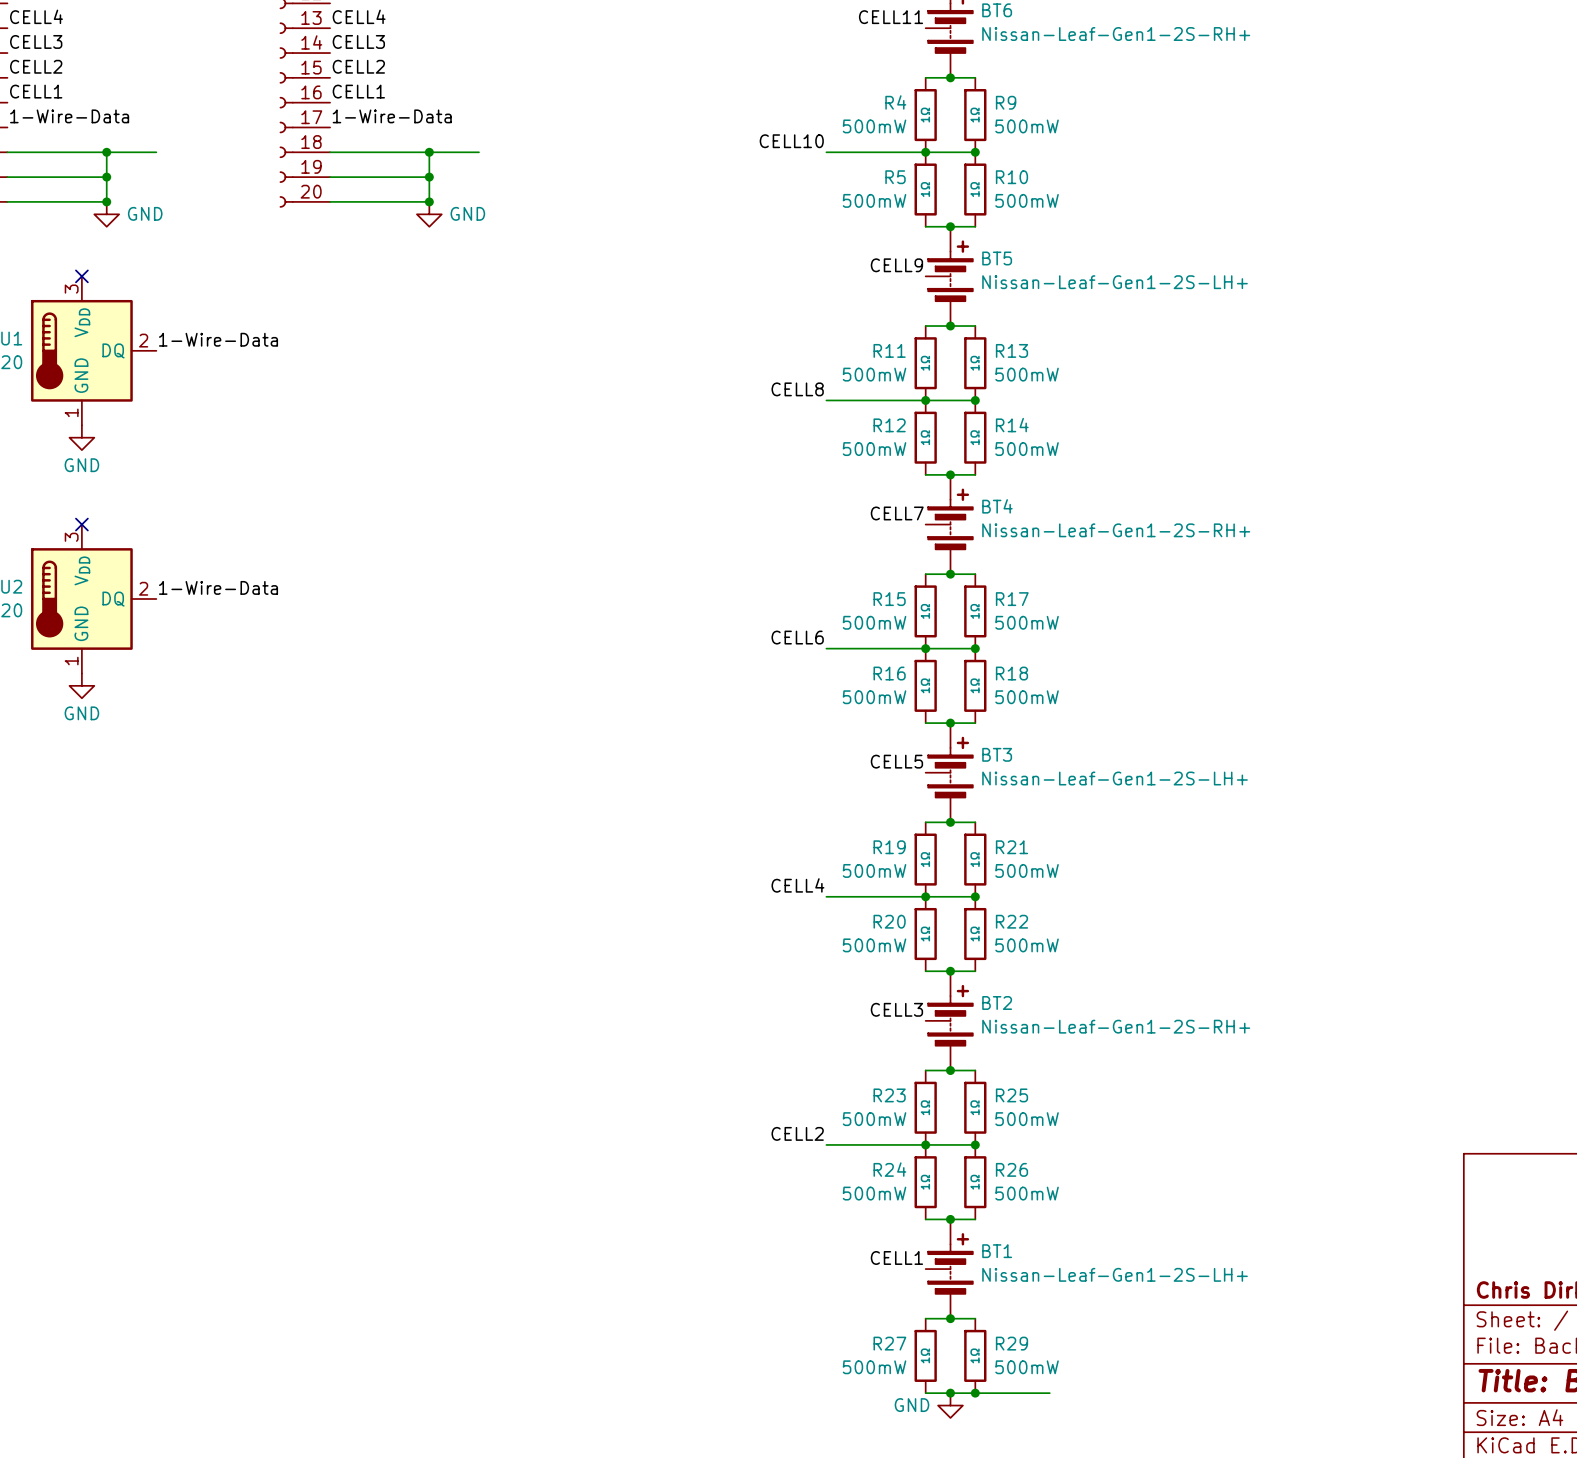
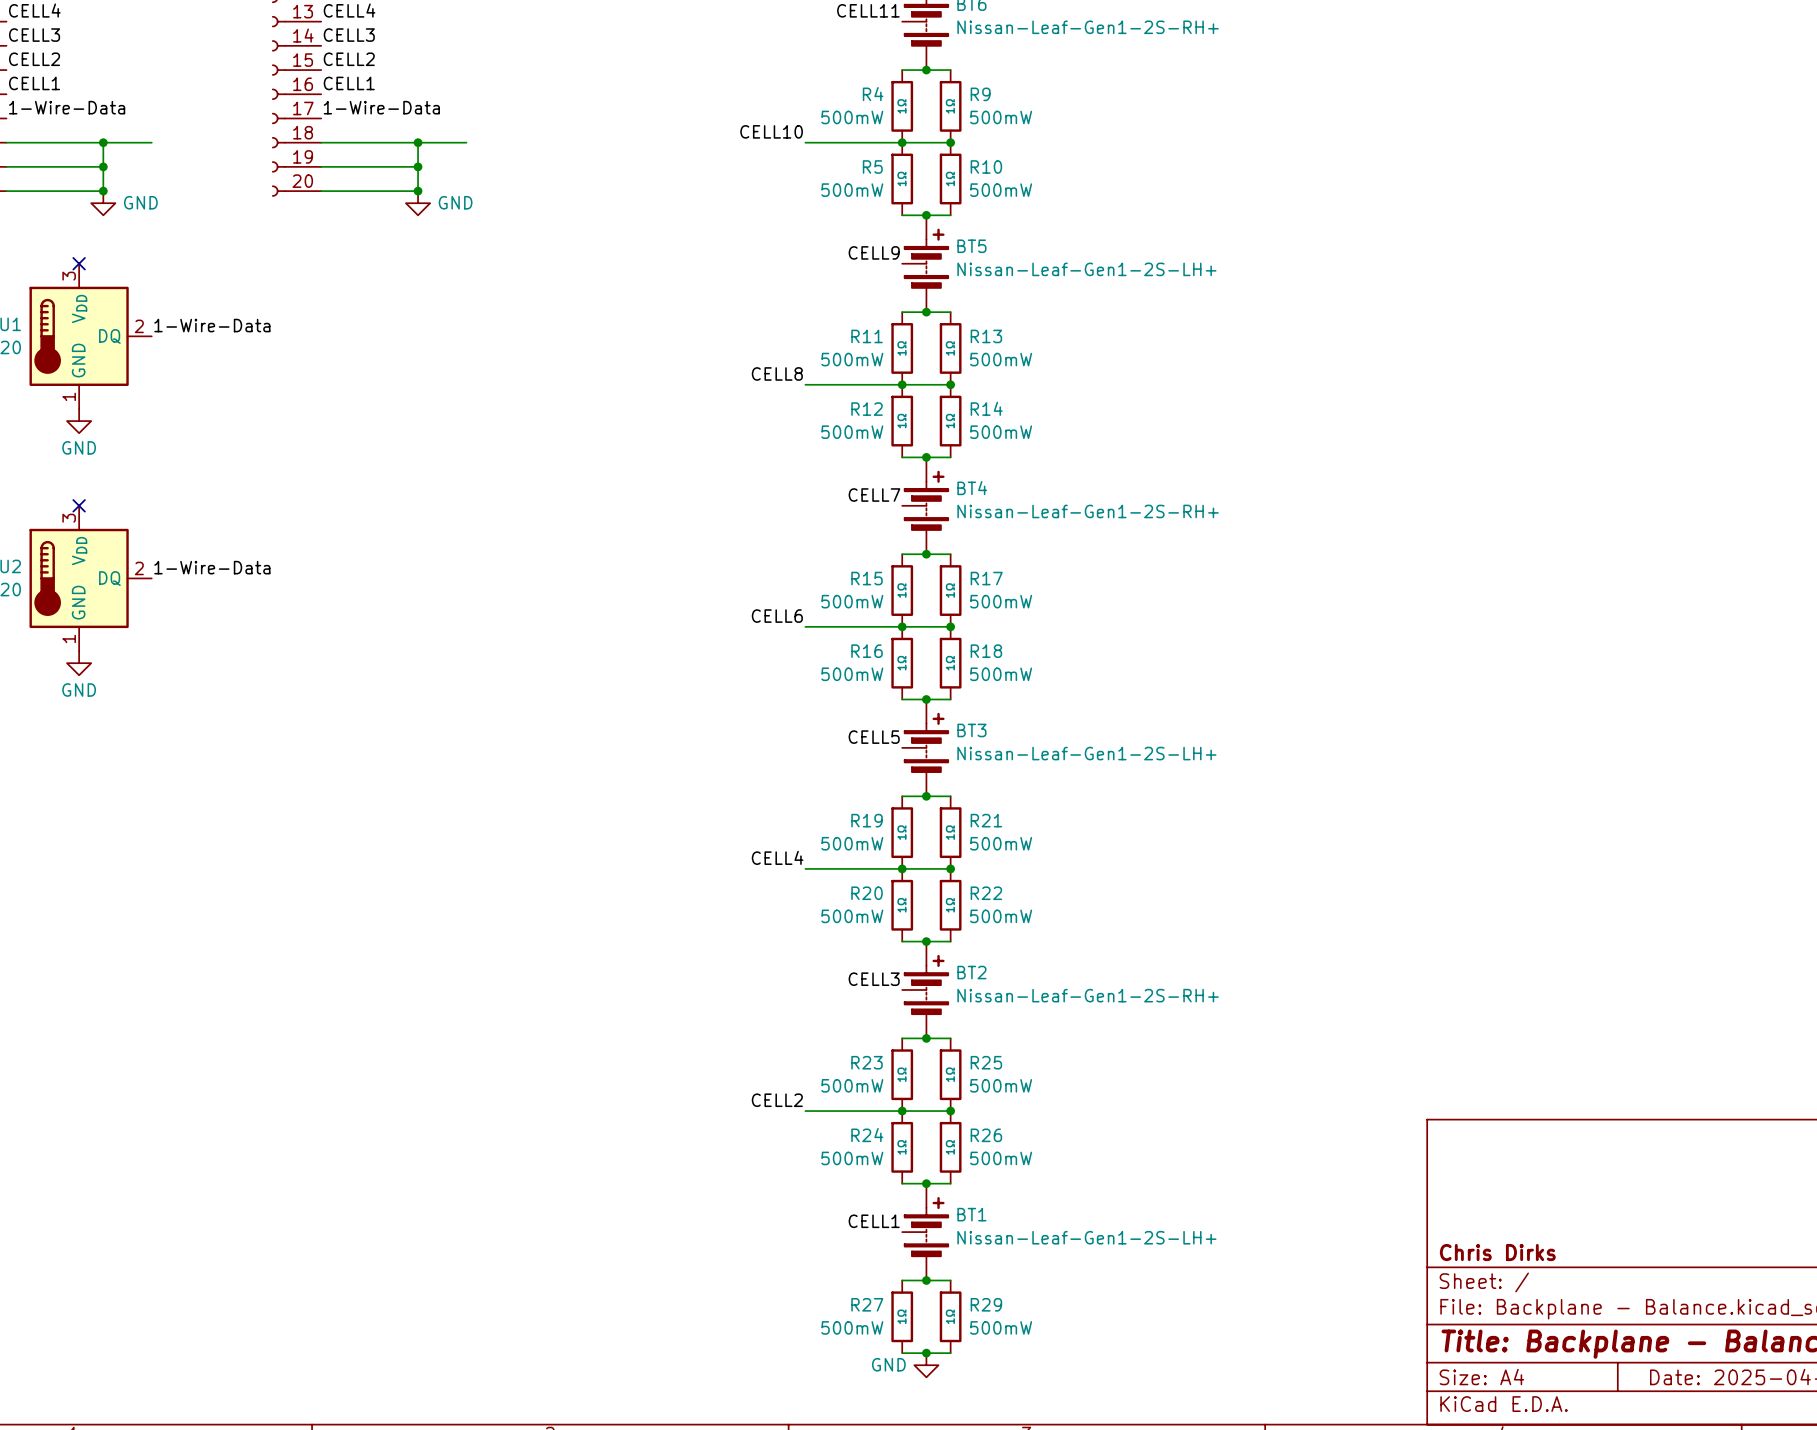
wire: (975, 1393) (1049, 1393) -> none
junction: (975, 1393) -> none

